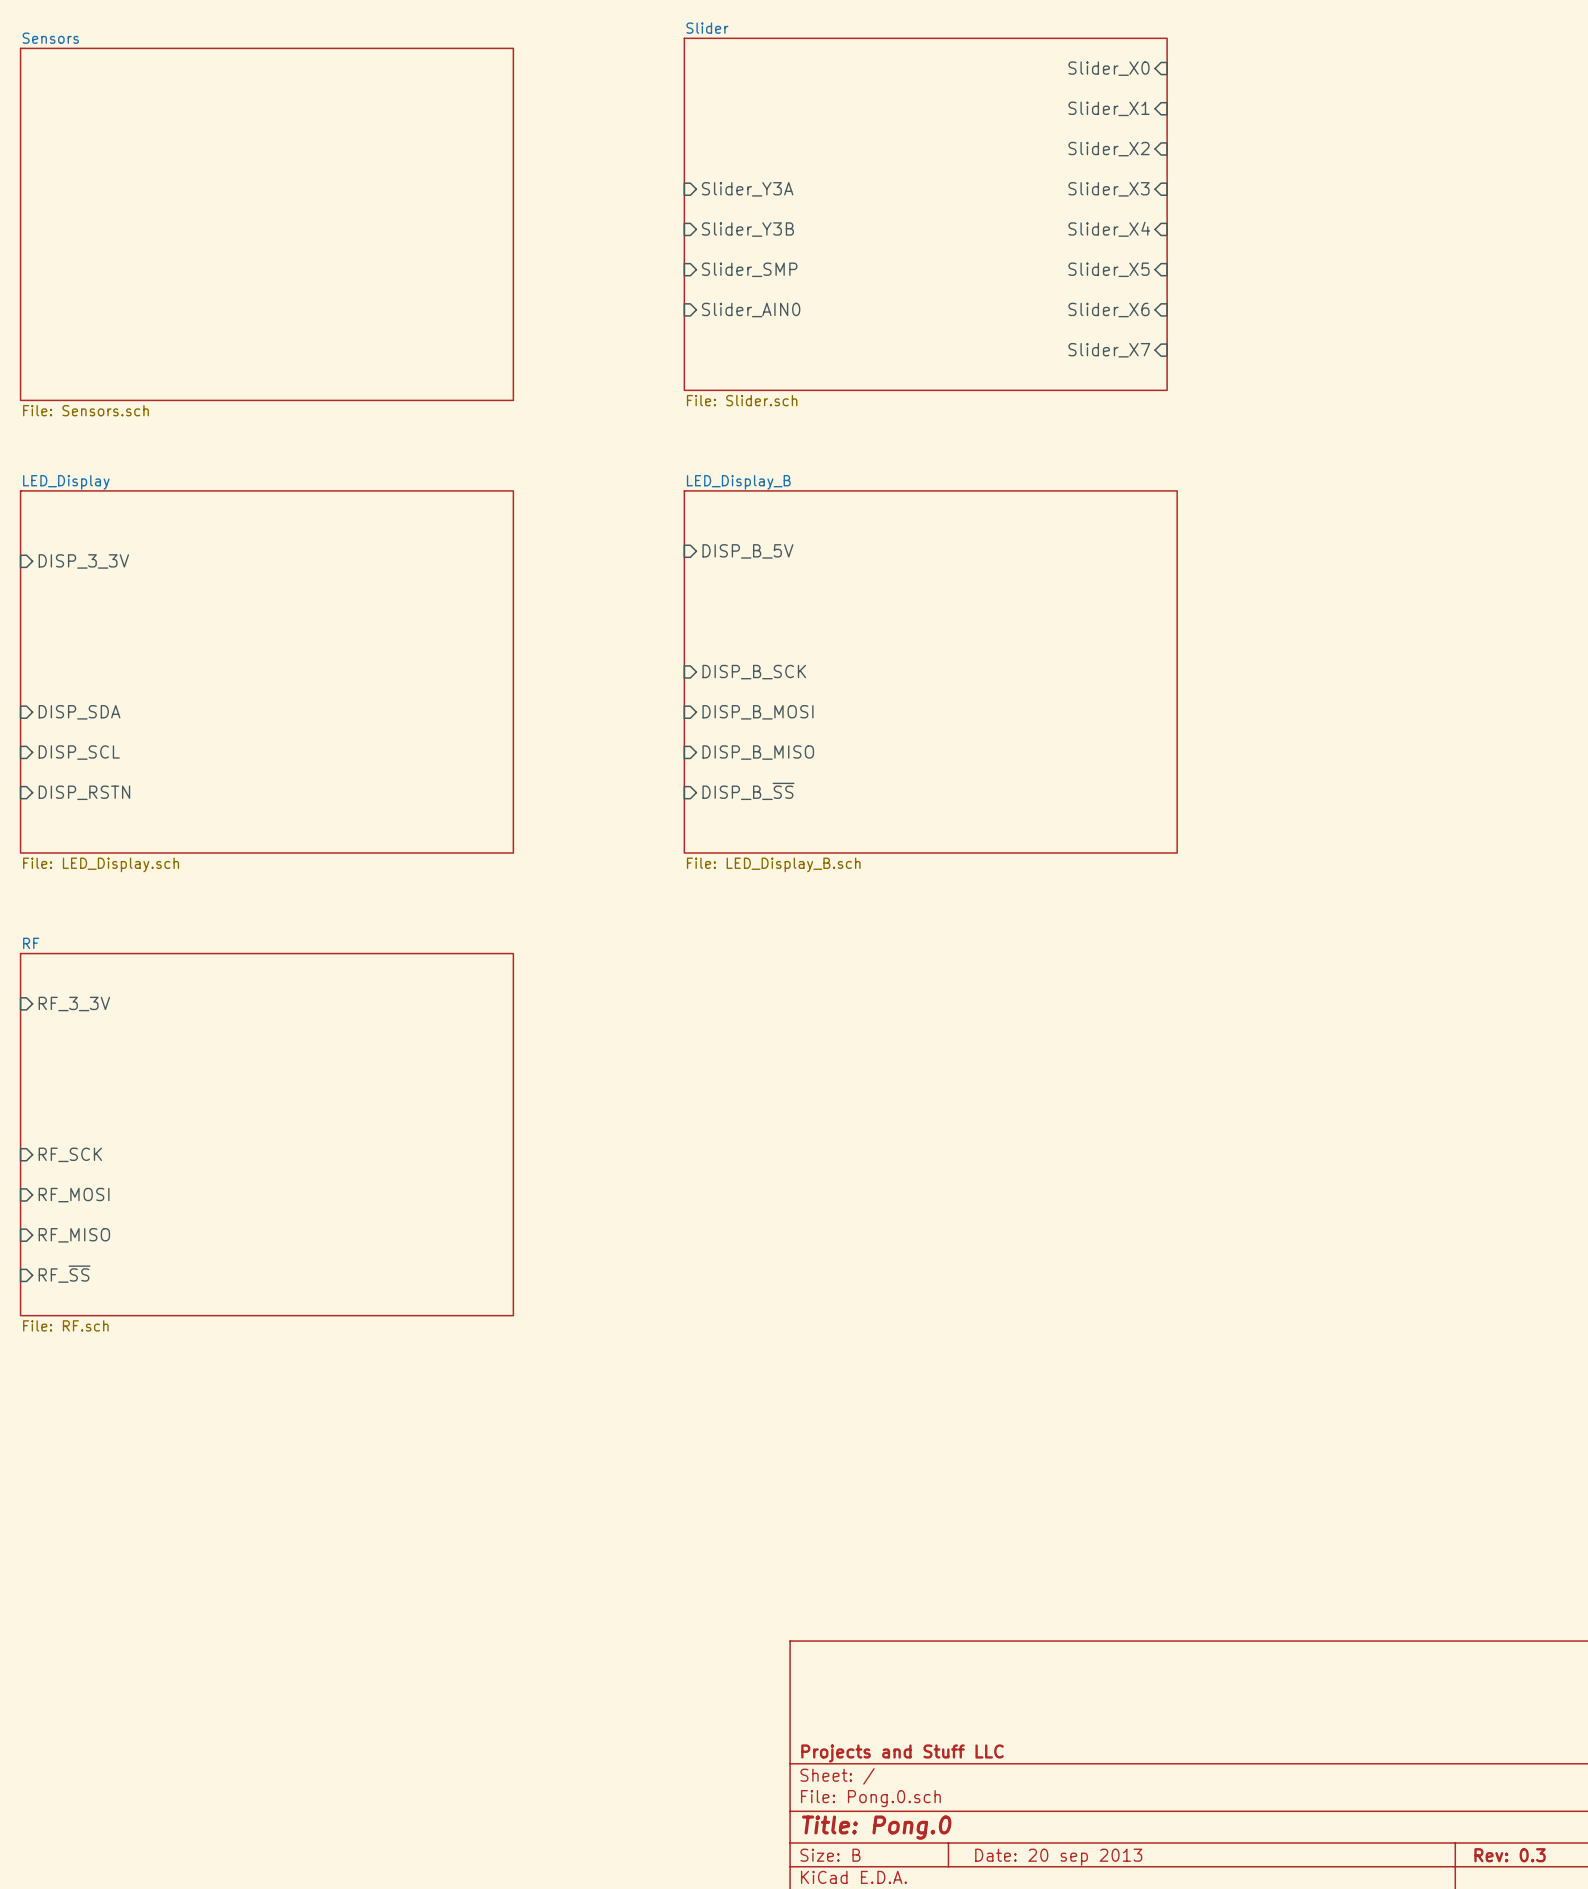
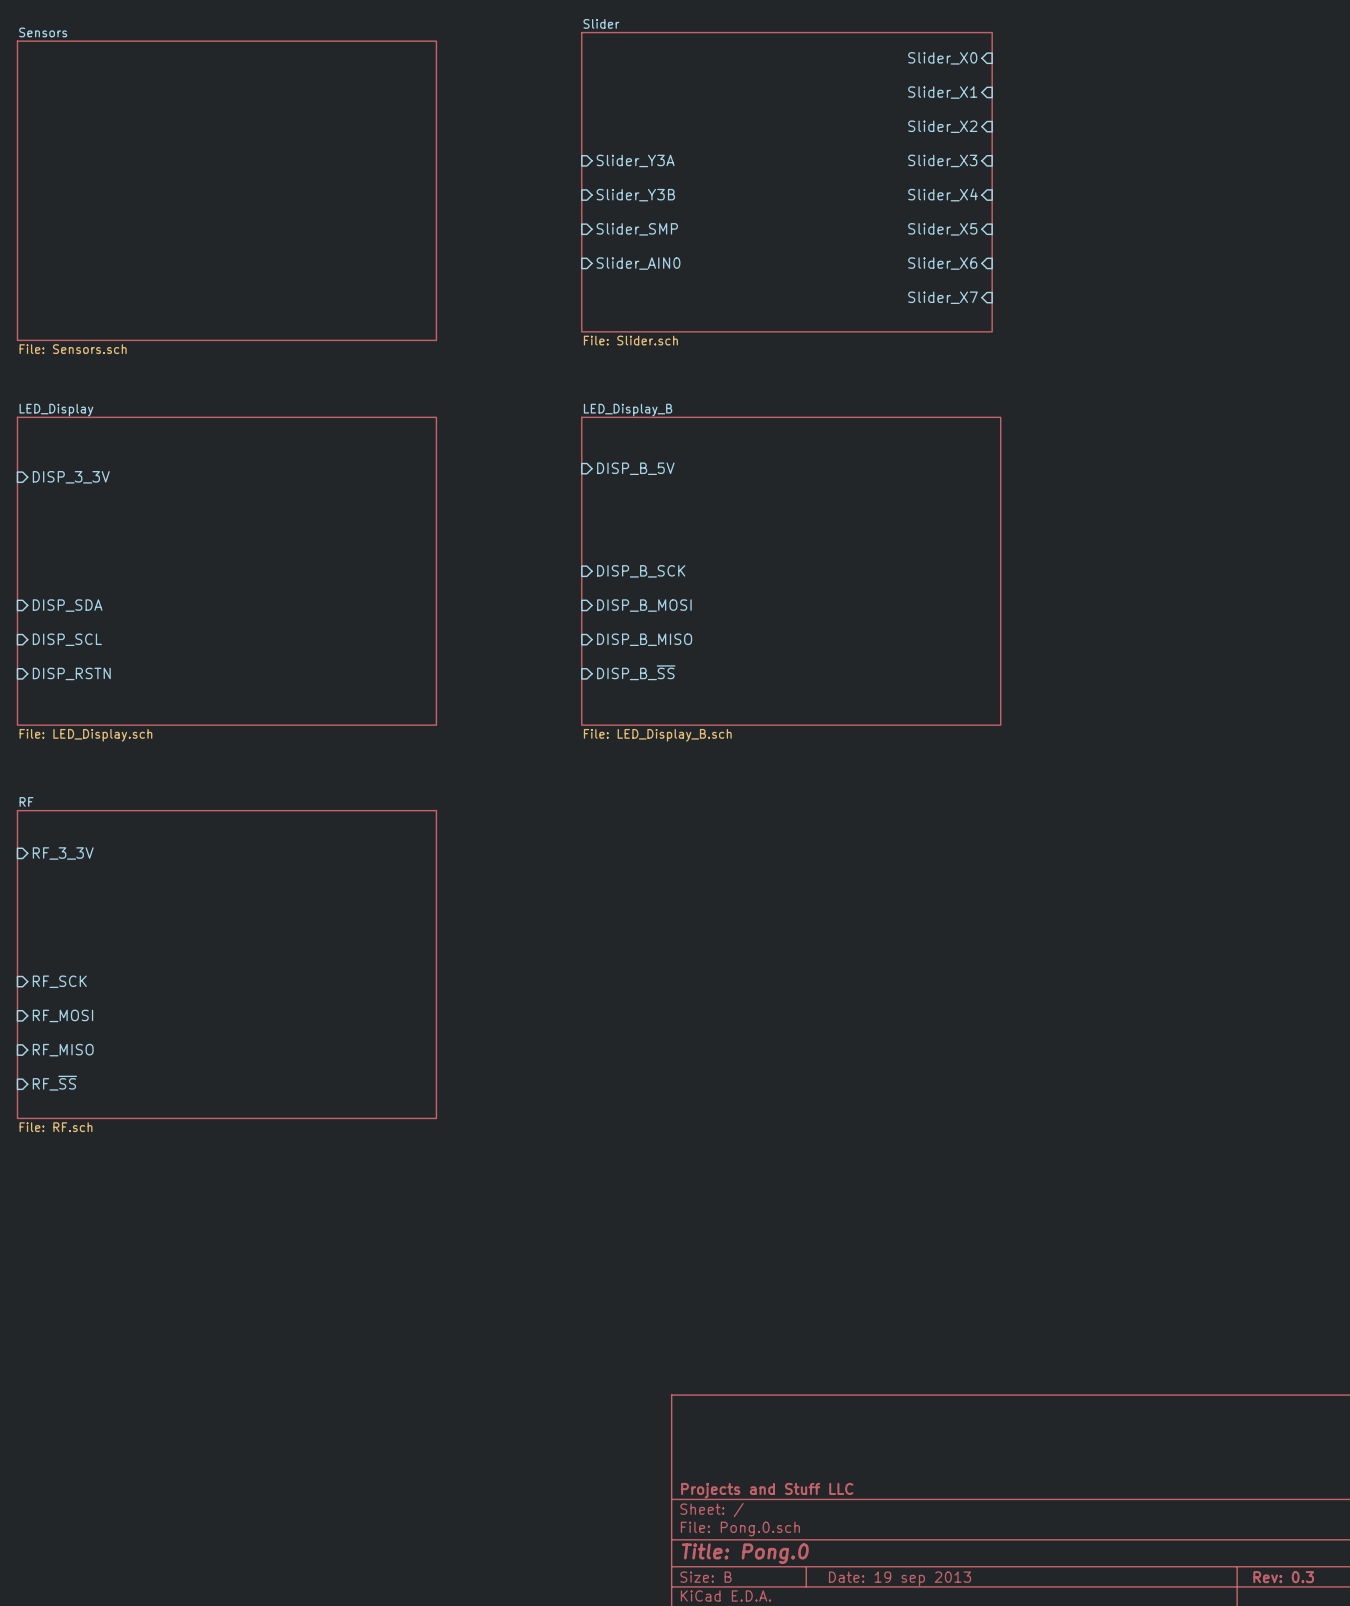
title block: Date: 20 sep 2013 (1058, 1857) -> Date: 19 sep 2013 (900, 1578)

